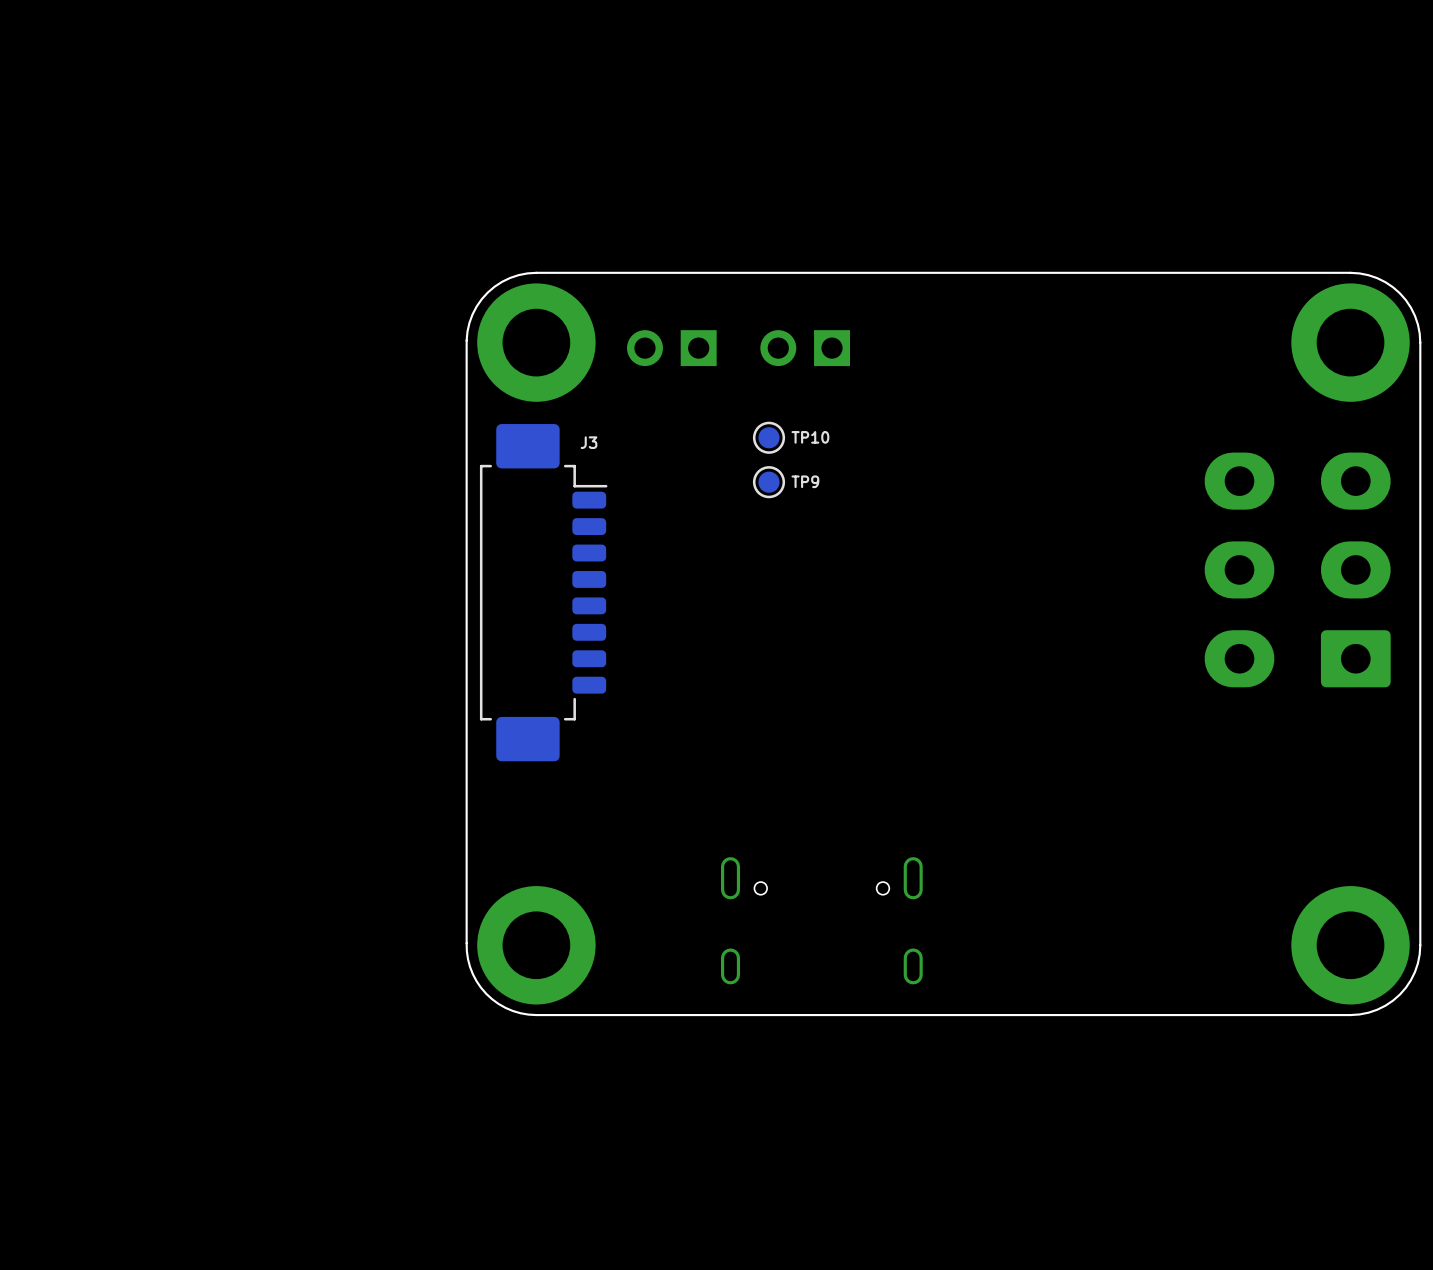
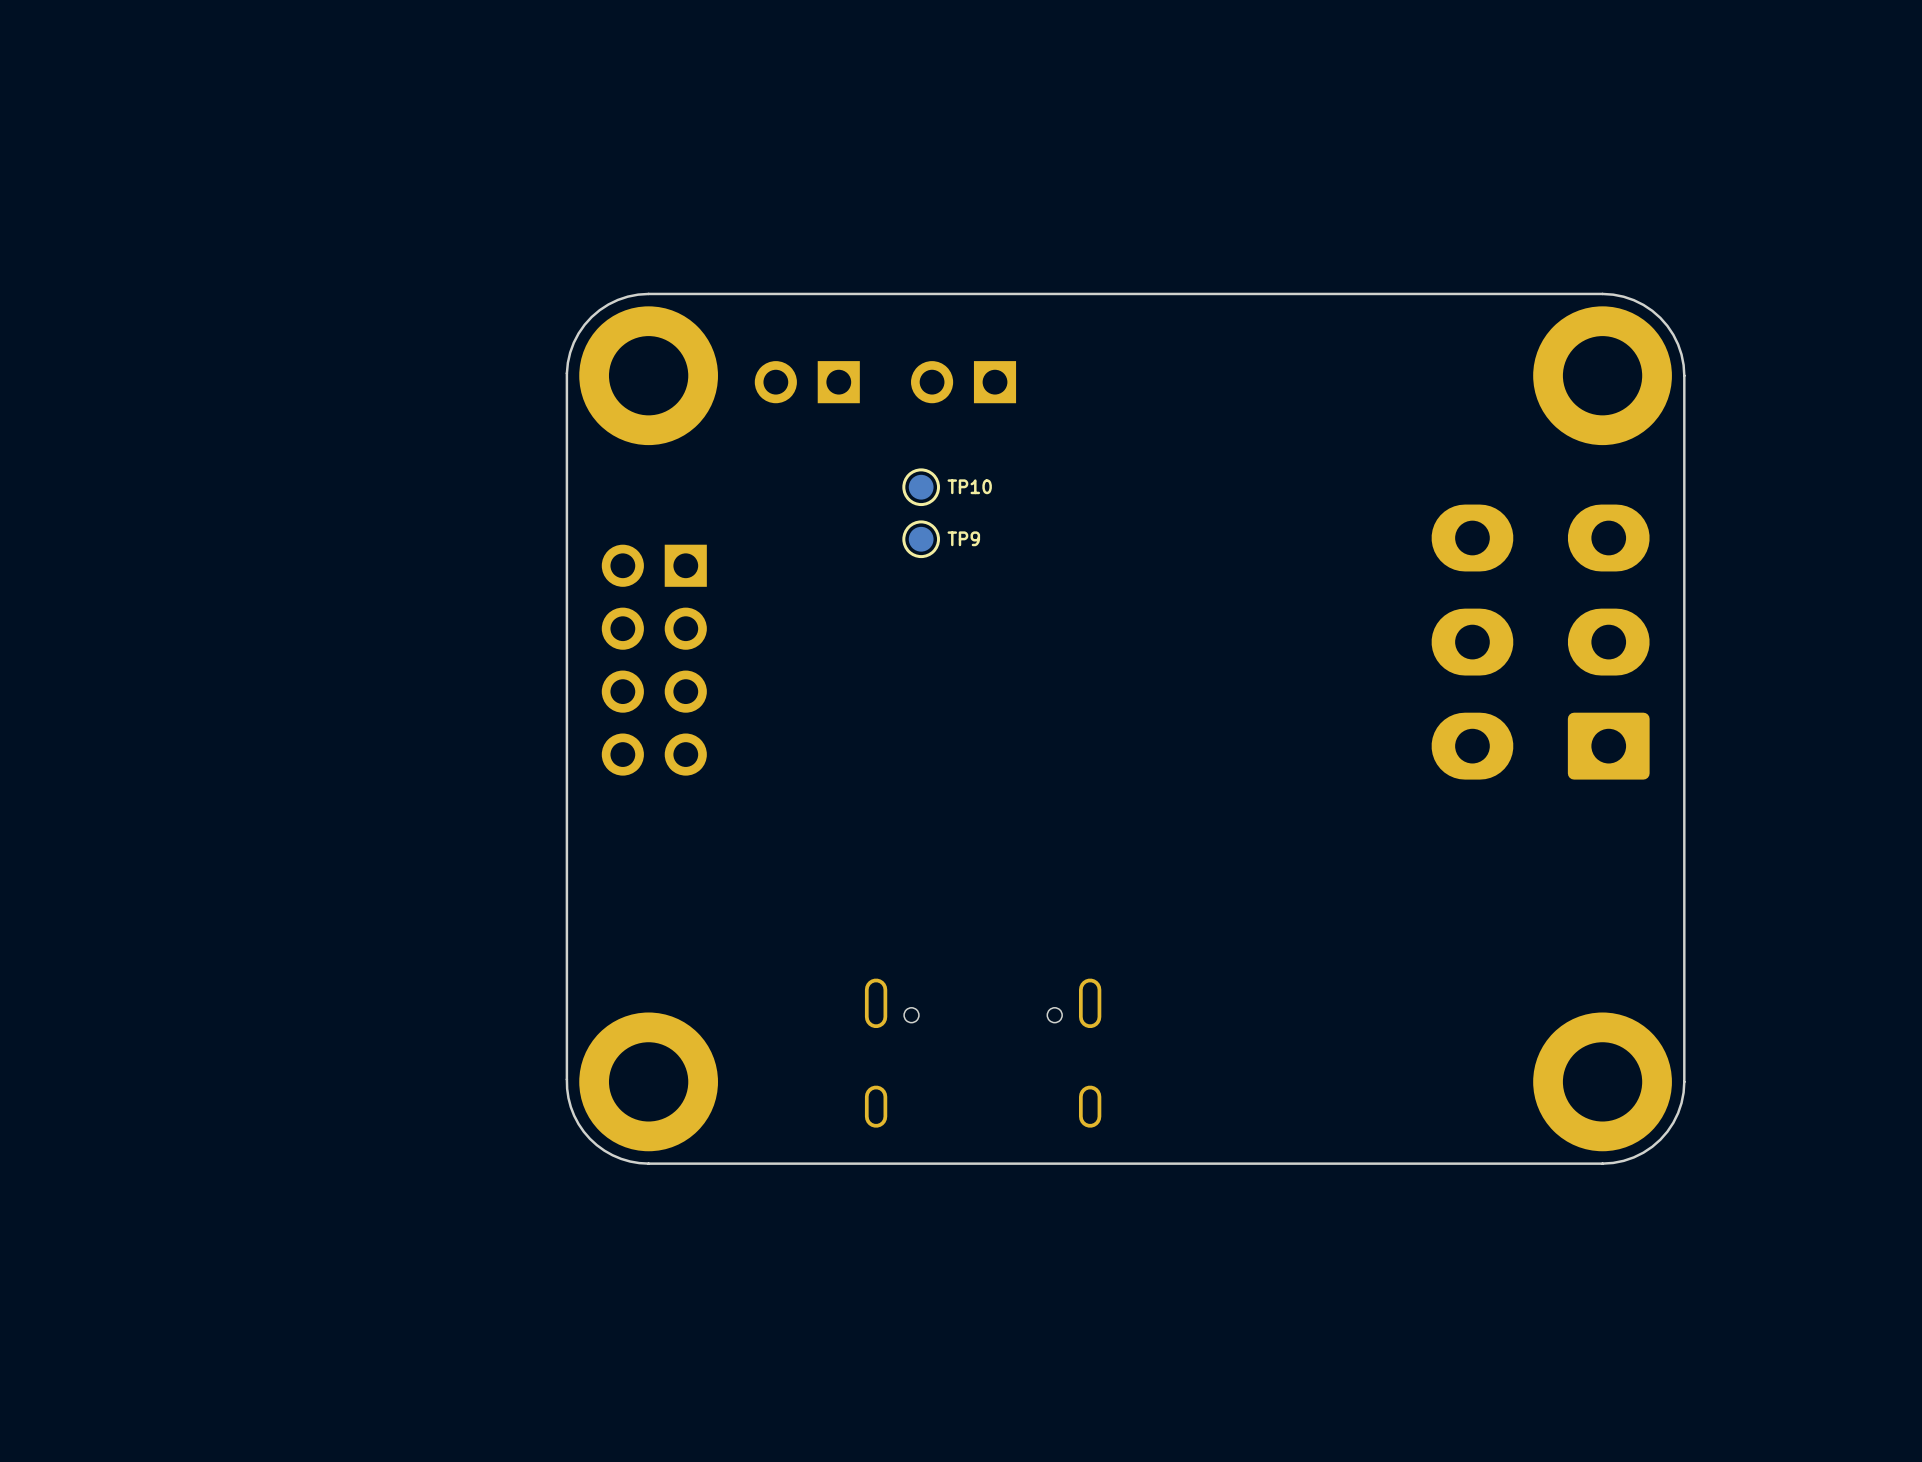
part: none -> (654, 660)
J3: (543, 592) -> none

